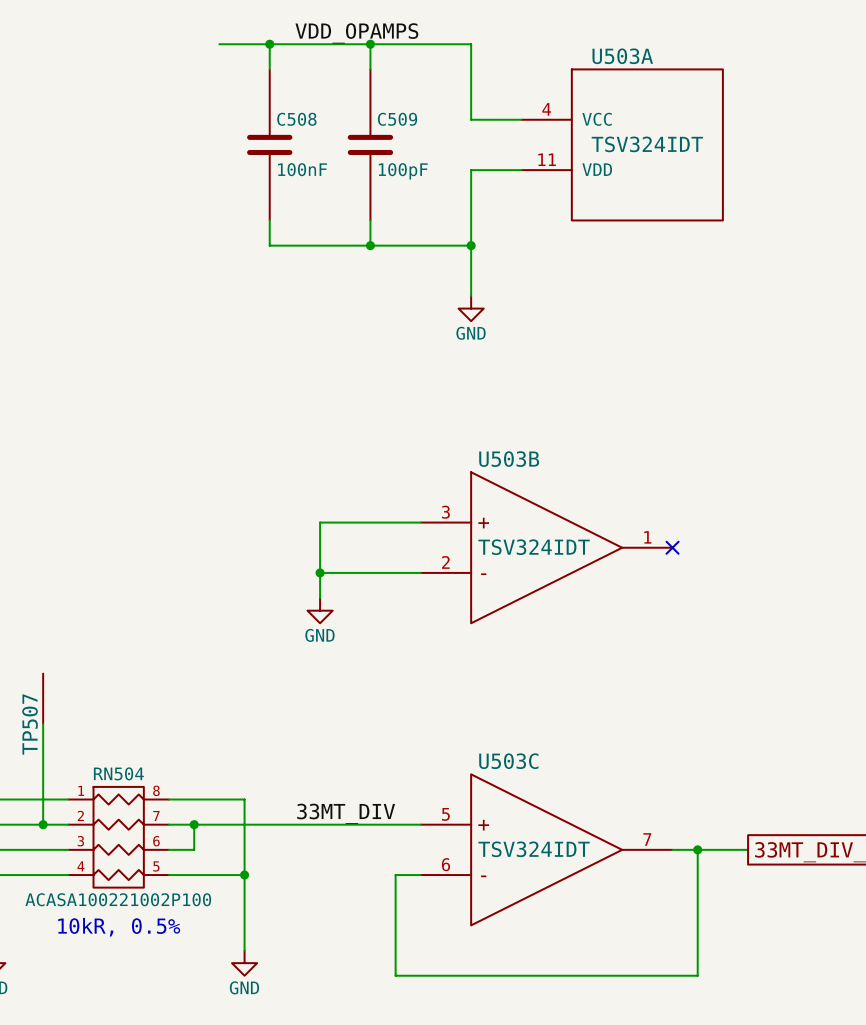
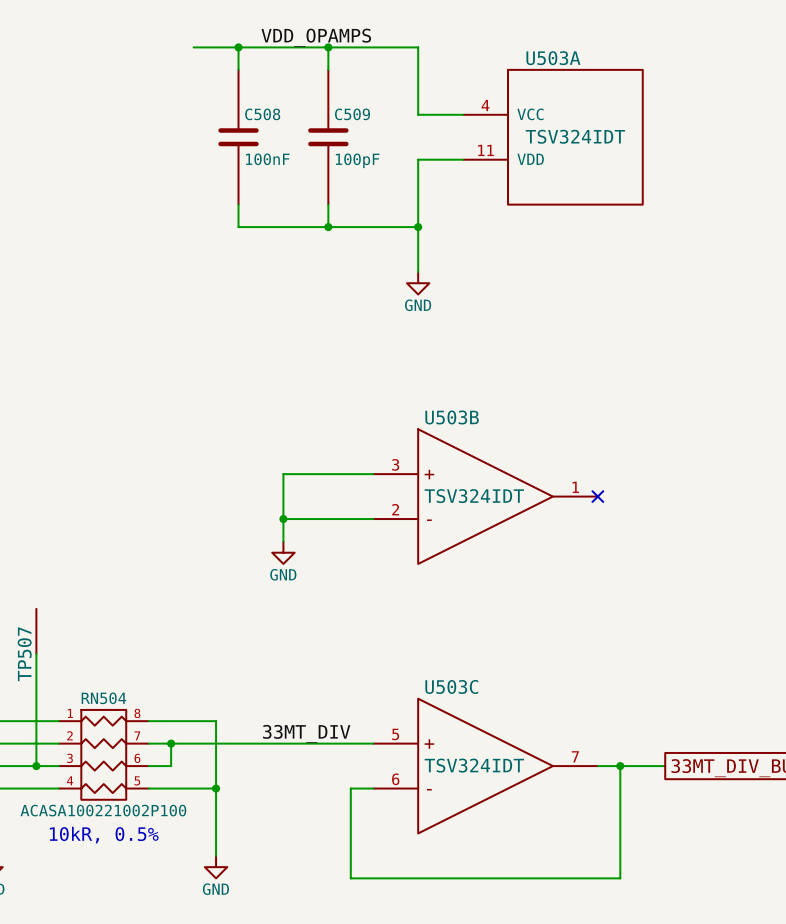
wire: none -> (36, 743) (36, 766)
junction: (43, 824) -> none
junction: none -> (36, 766)

